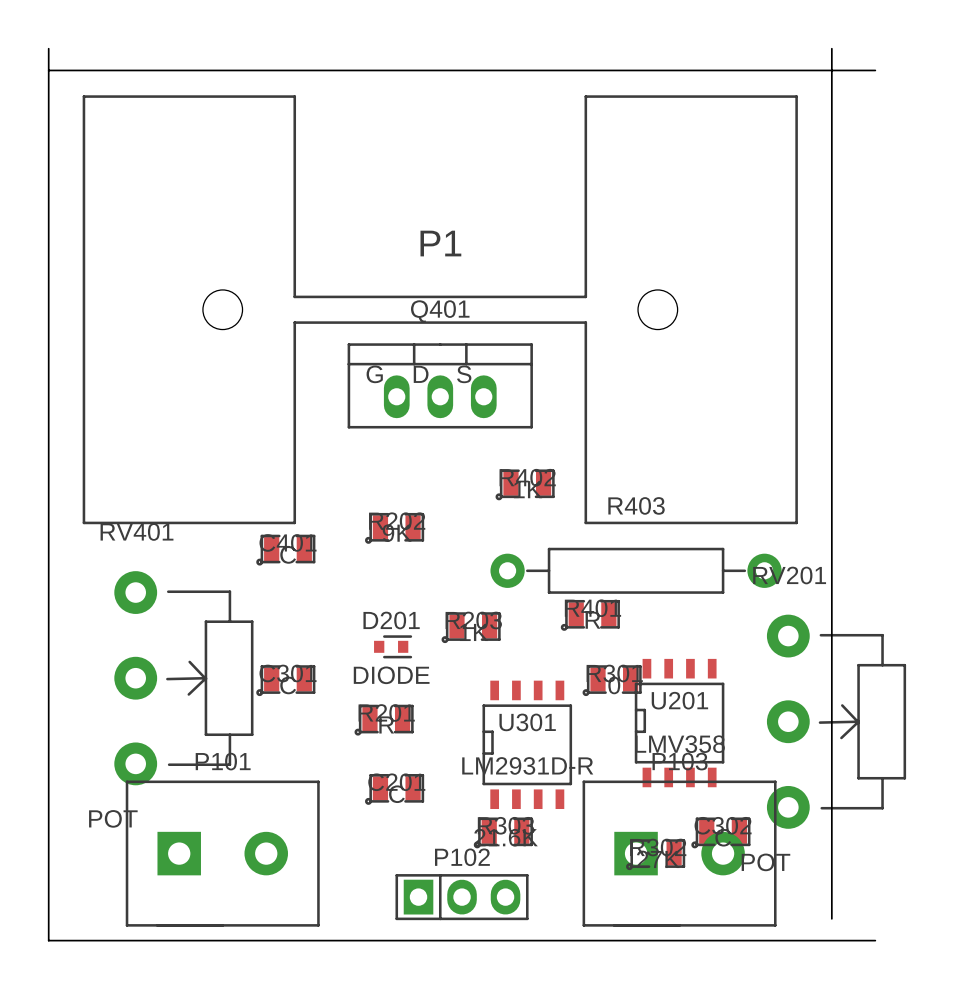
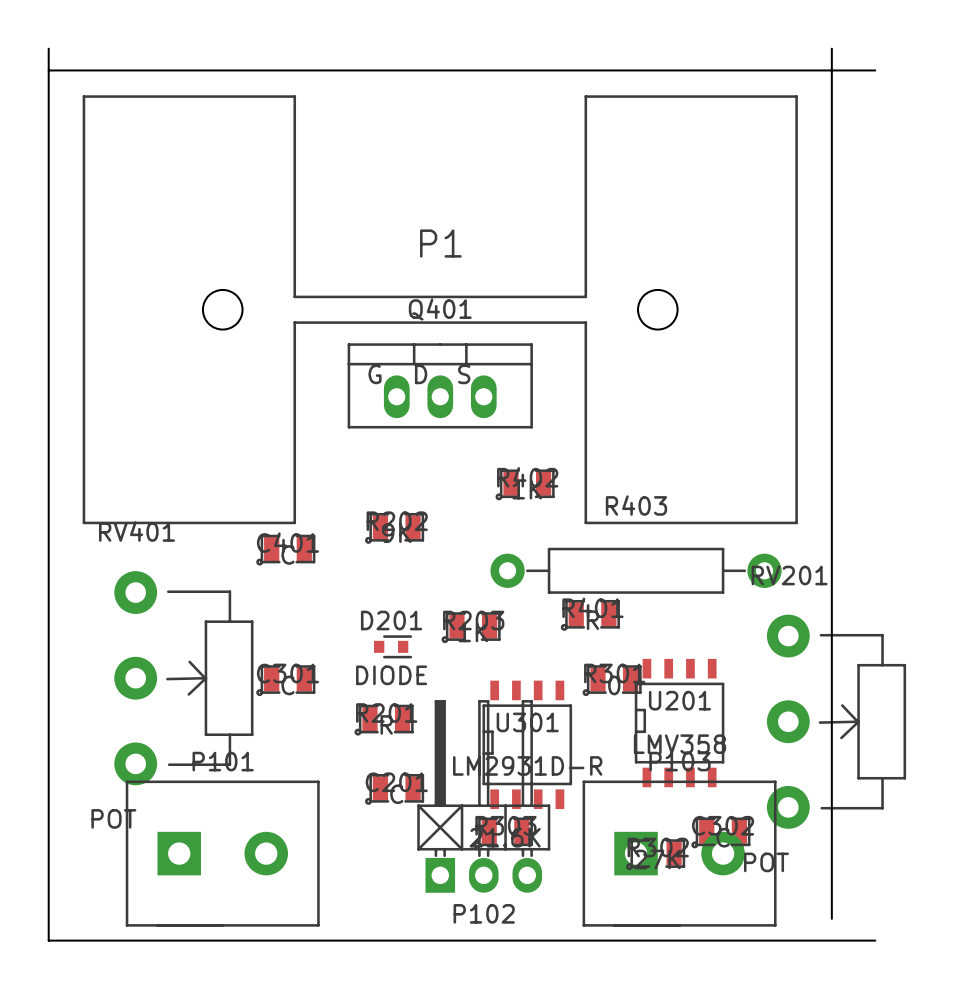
P102 name position: P102 (462, 857) -> P102 (484, 913)
P102 footprint: [395, 874, 529, 921] -> [417, 700, 551, 893]

